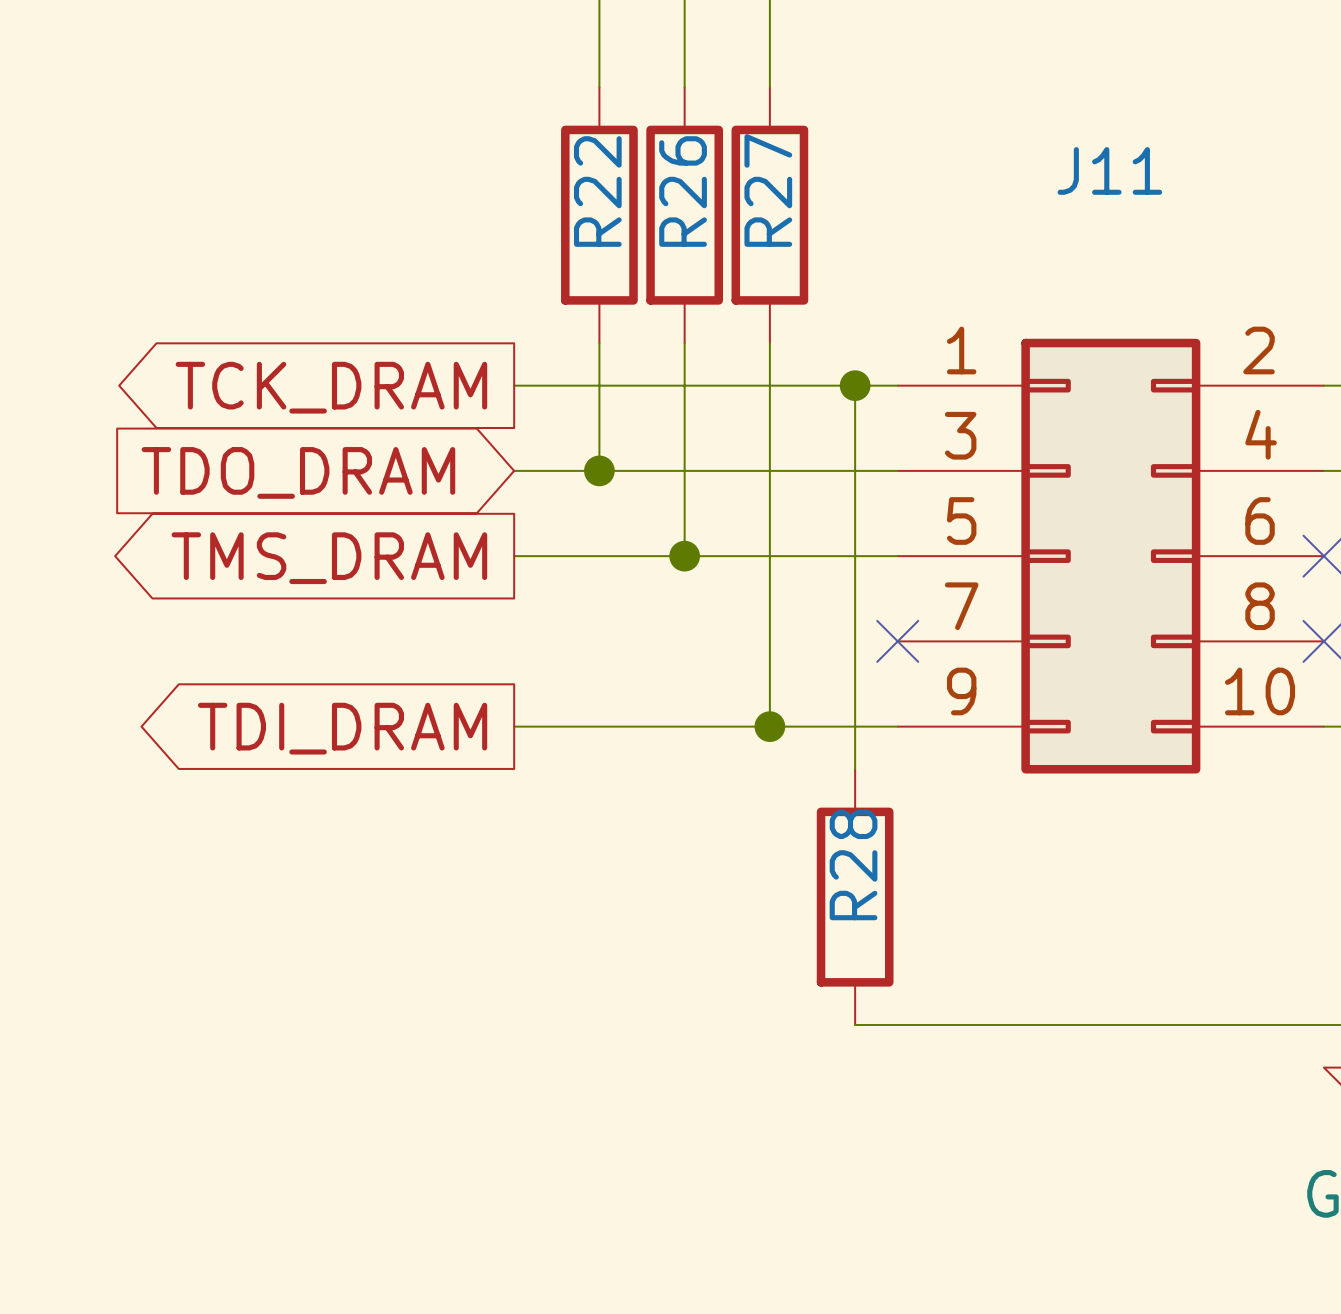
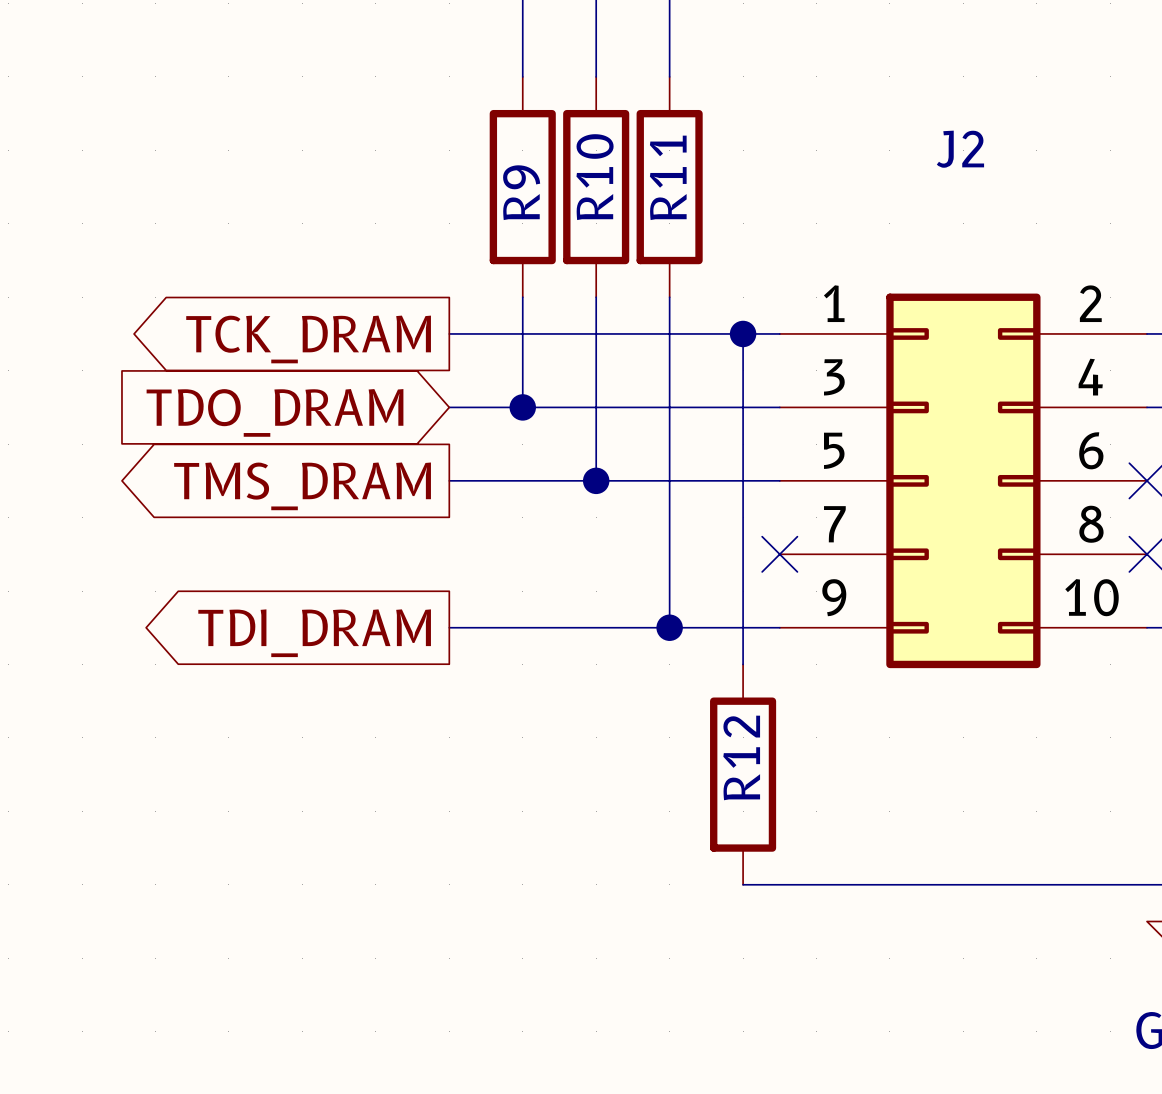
J11 name: J11 (1109, 170) -> J2 (960, 149)
R27 name: R27 (768, 190) -> R11 (668, 177)
R22 name: R22 (597, 191) -> R9 (521, 192)
R26 name: R26 (683, 191) -> R10 (595, 177)
R28 name: R28 (853, 864) -> R12 (741, 757)

